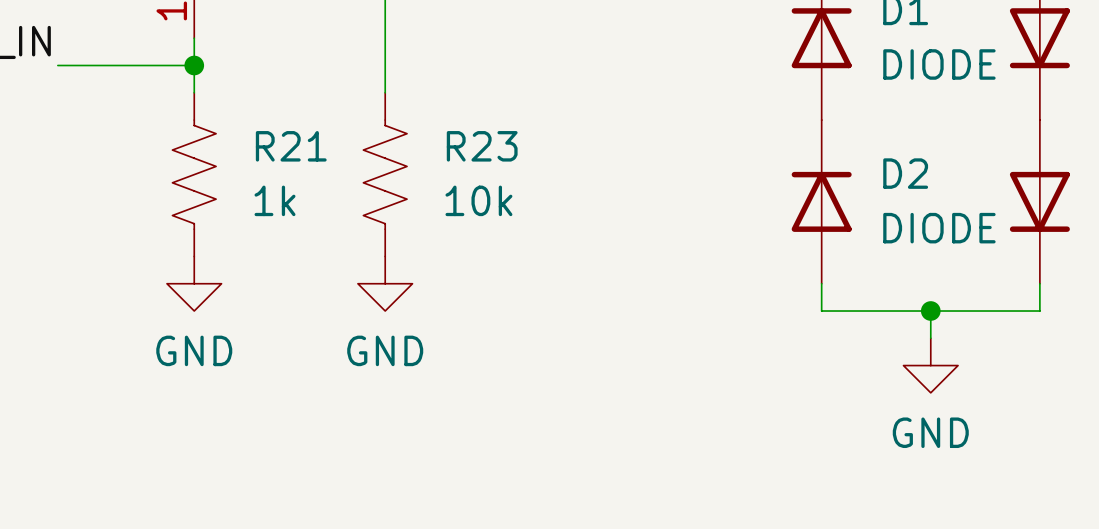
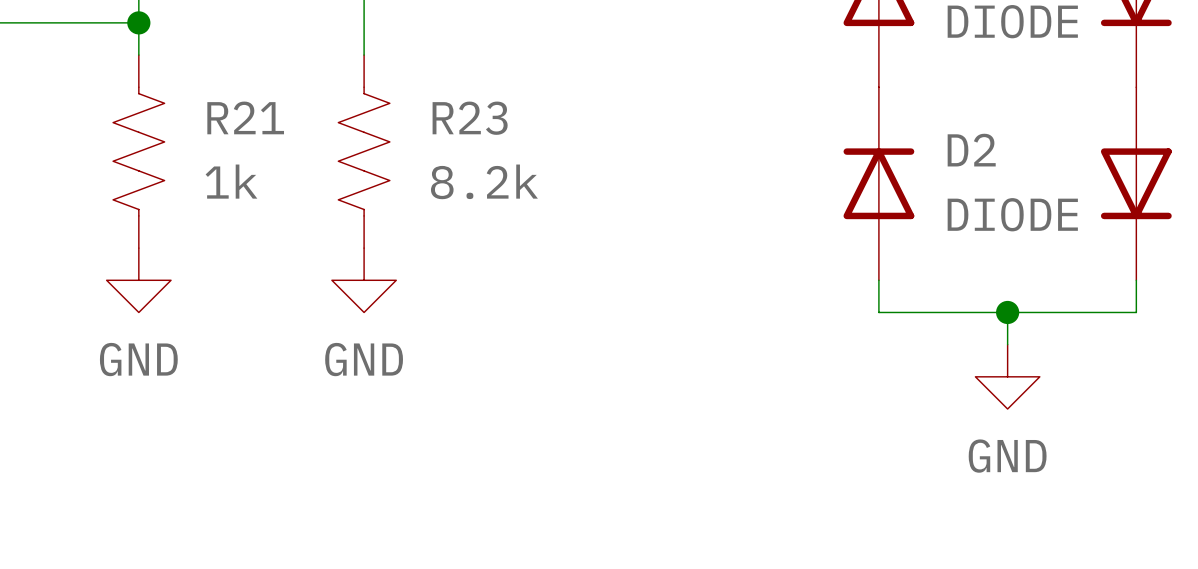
R23 value: 10k (478, 200) -> 8.2k (484, 181)

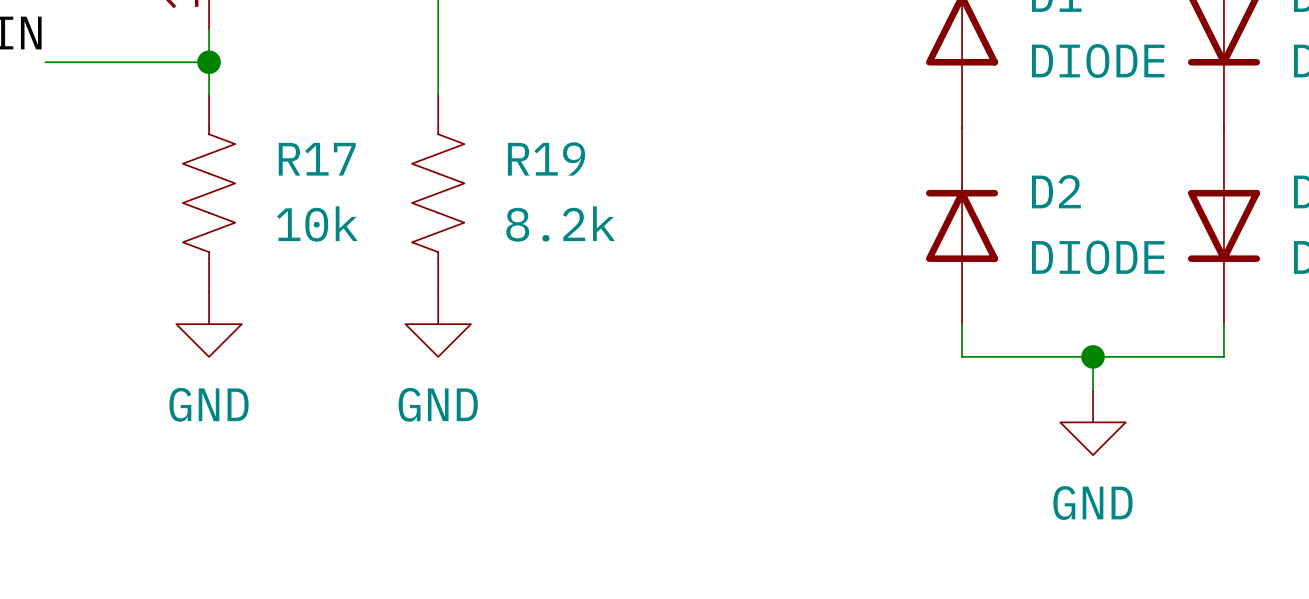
R21 name: R21 (245, 117) -> R17 (317, 159)
R23 name: R23 (470, 118) -> R19 (546, 158)
R21 value: 1k (231, 181) -> 10k (317, 224)

